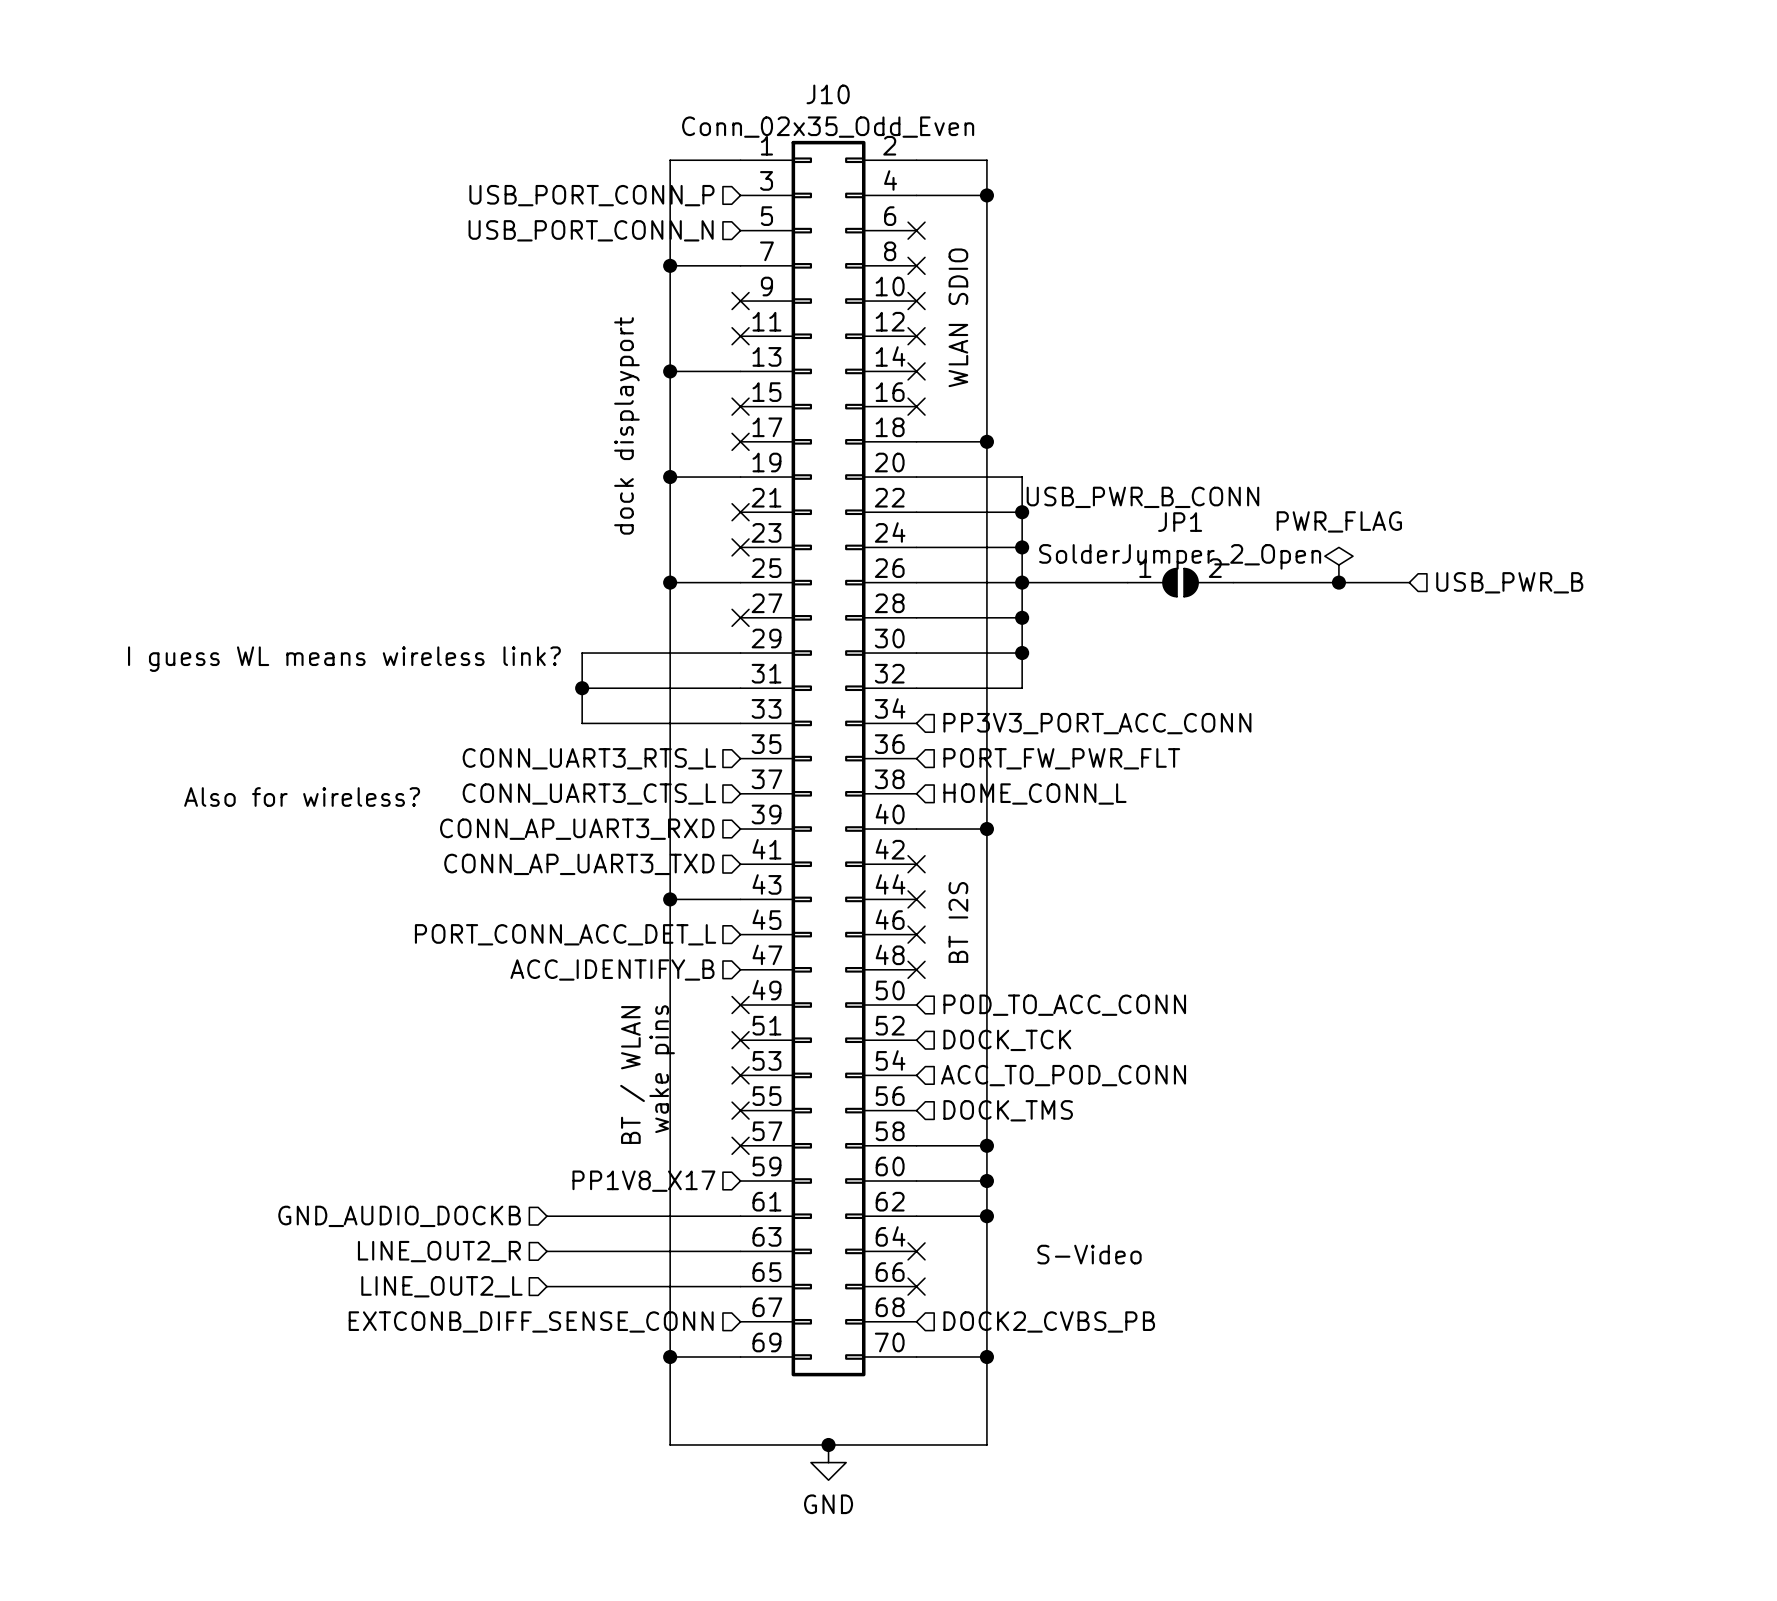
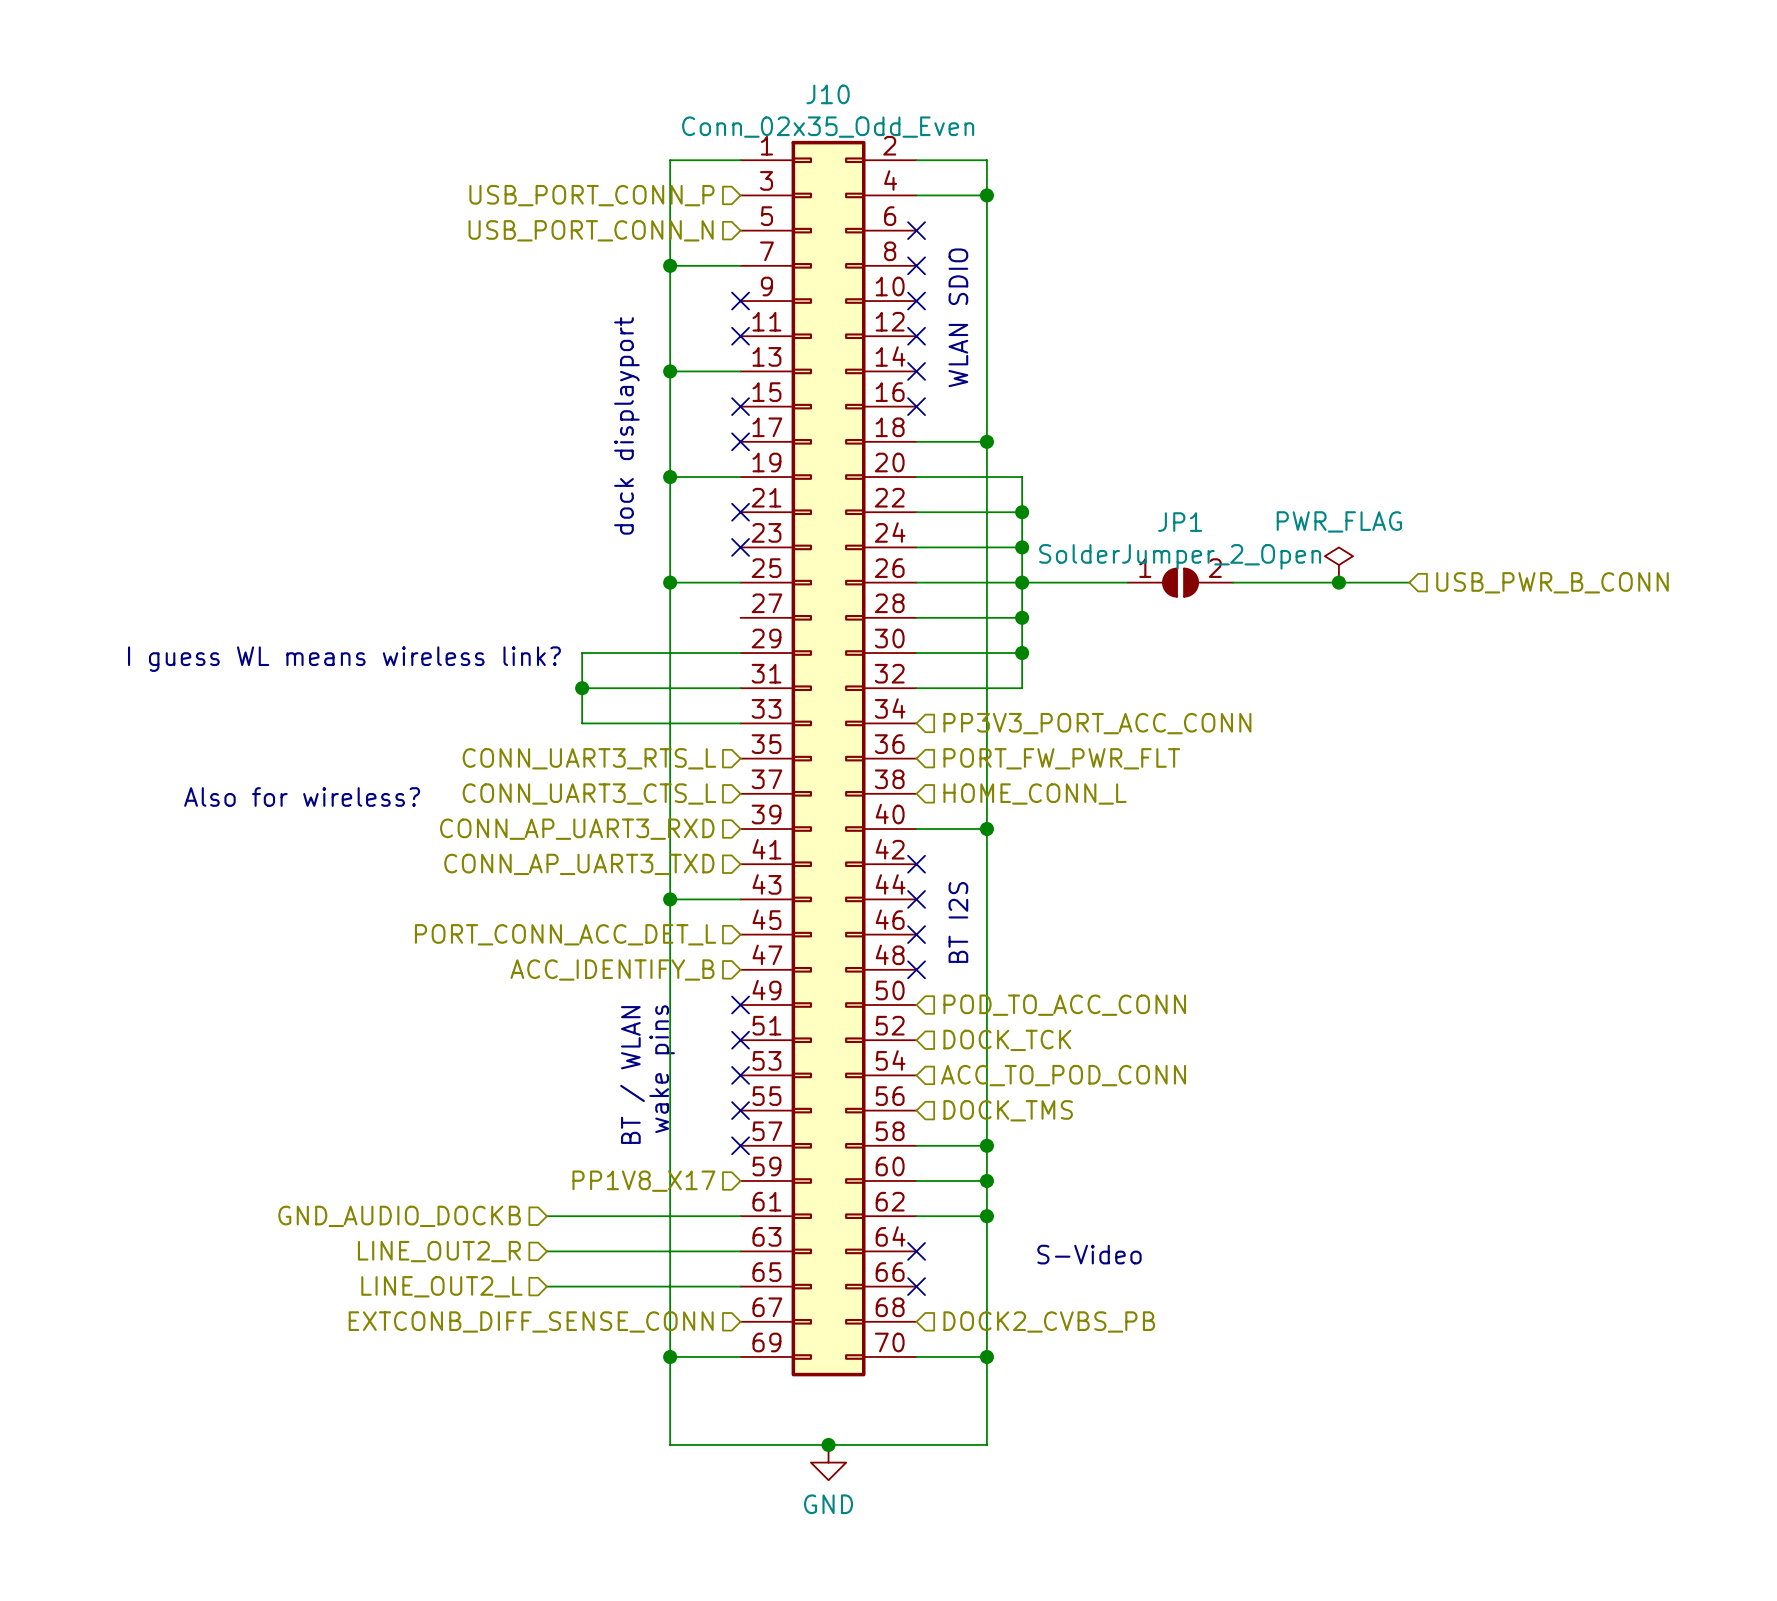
label: USB_PWR_B_CONN (1142, 497) -> none
hierarchical label: USB_PWR_B (1509, 582) -> USB_PWR_B_CONN (1552, 582)
no-connect mark: (740, 617) -> none

